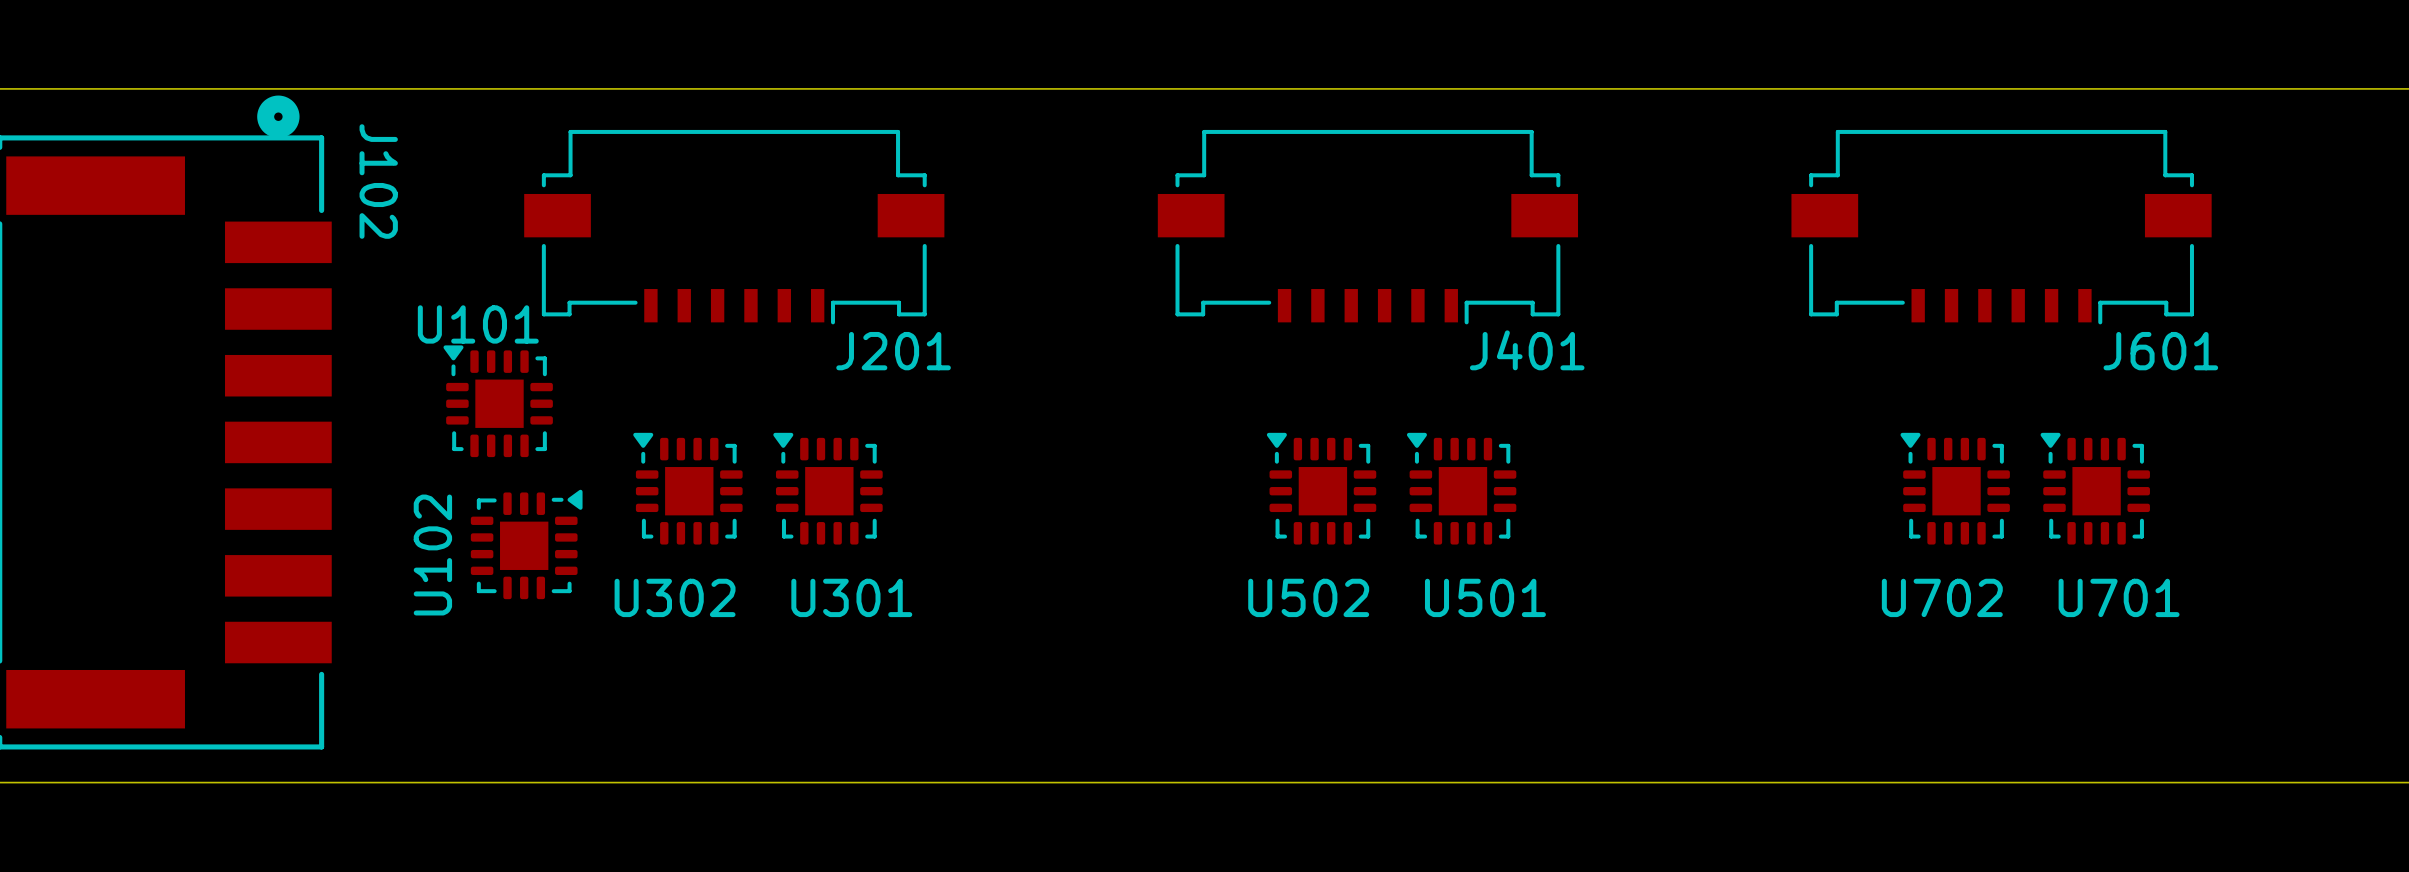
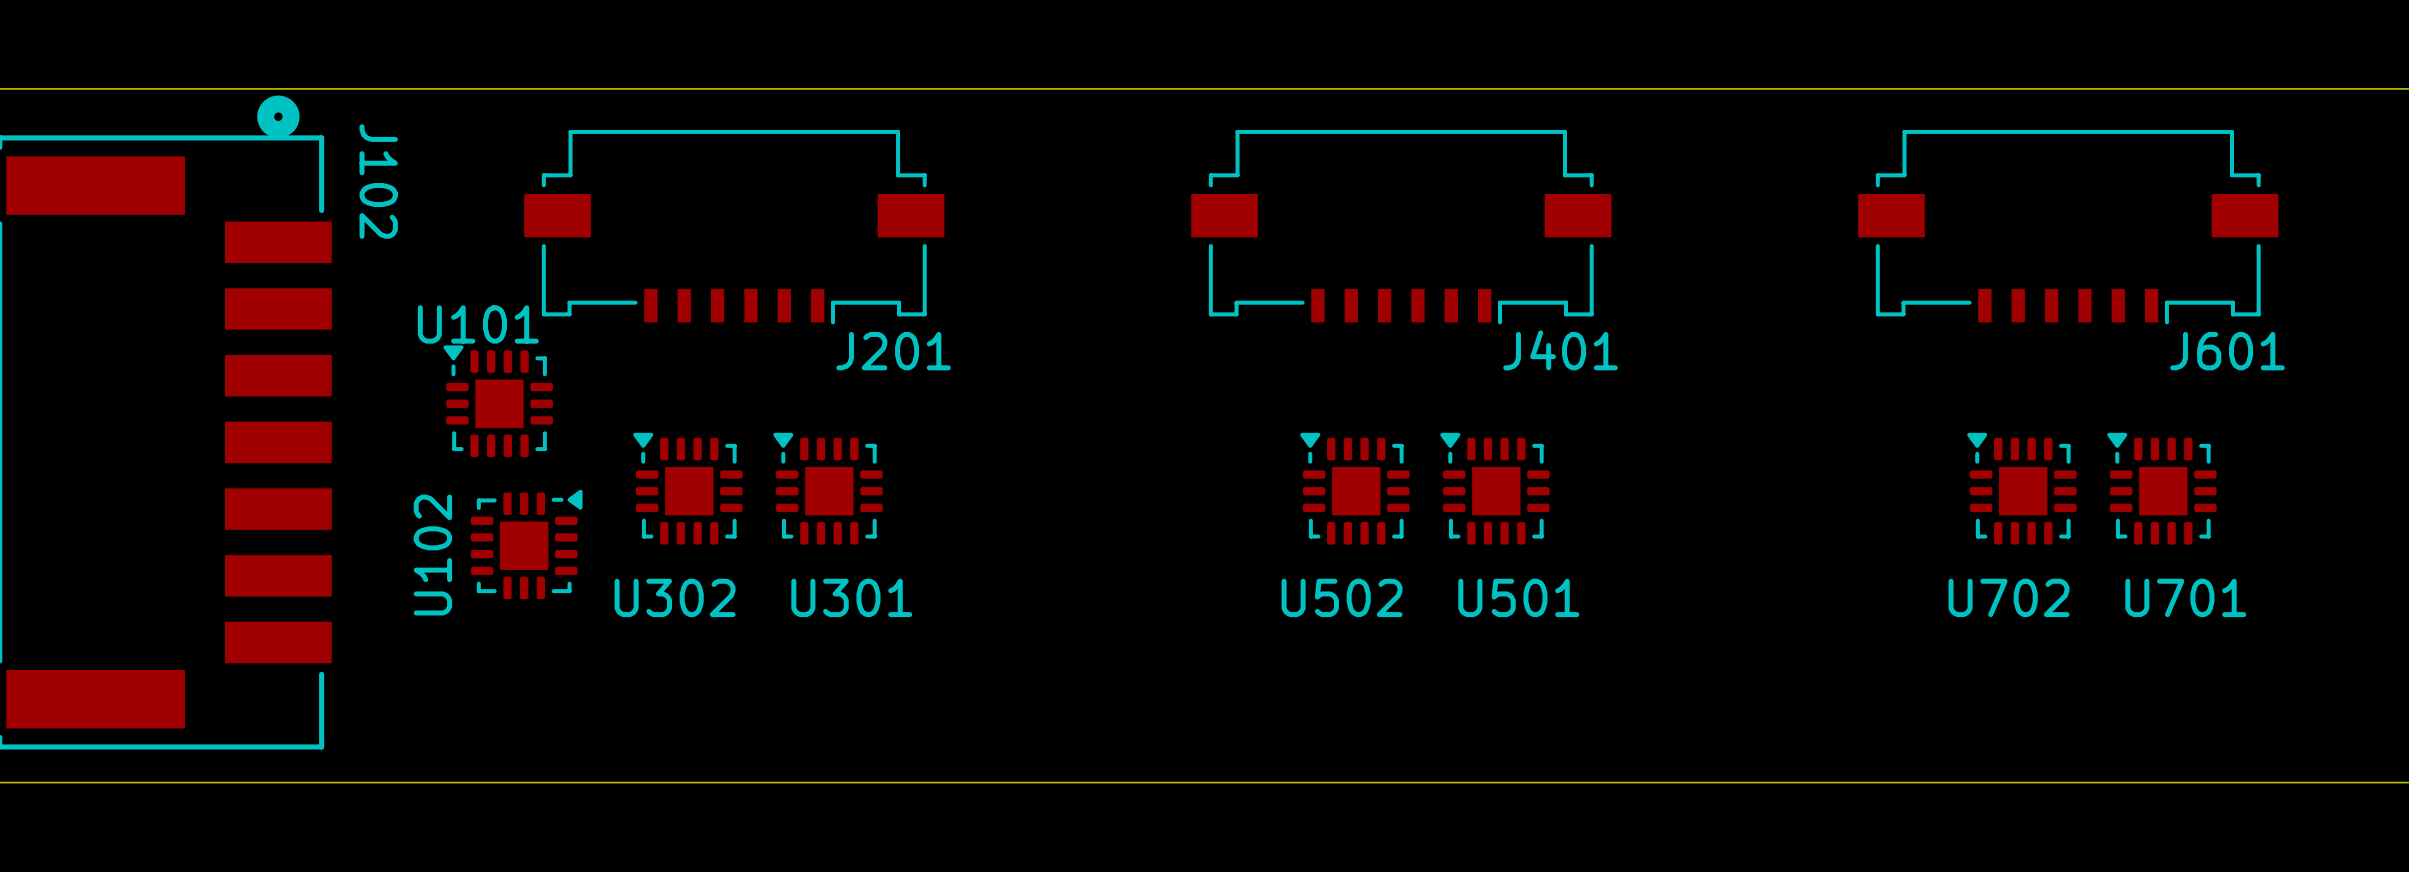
J401 position: (1367, 227) -> (1401, 227)
J601 position: (2001, 227) -> (2068, 227)
U502 position: (1321, 488) -> (1354, 488)
U501 position: (1461, 488) -> (1494, 488)
U702 position: (1955, 488) -> (2021, 488)
U701 position: (2095, 488) -> (2161, 488)

